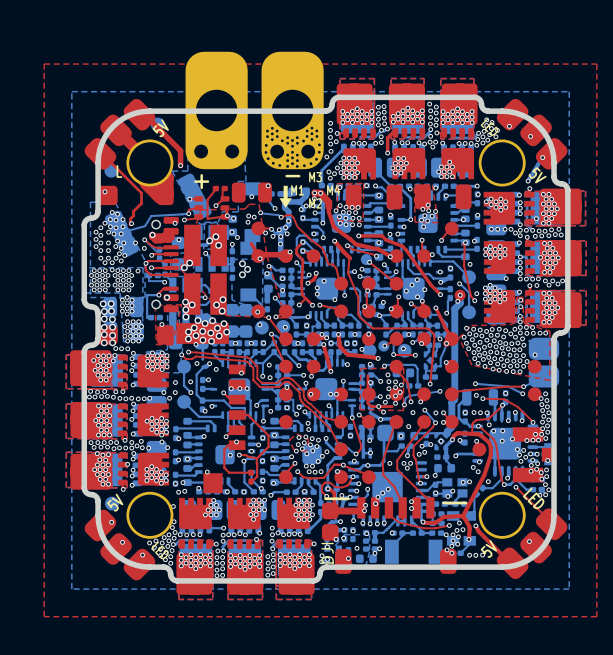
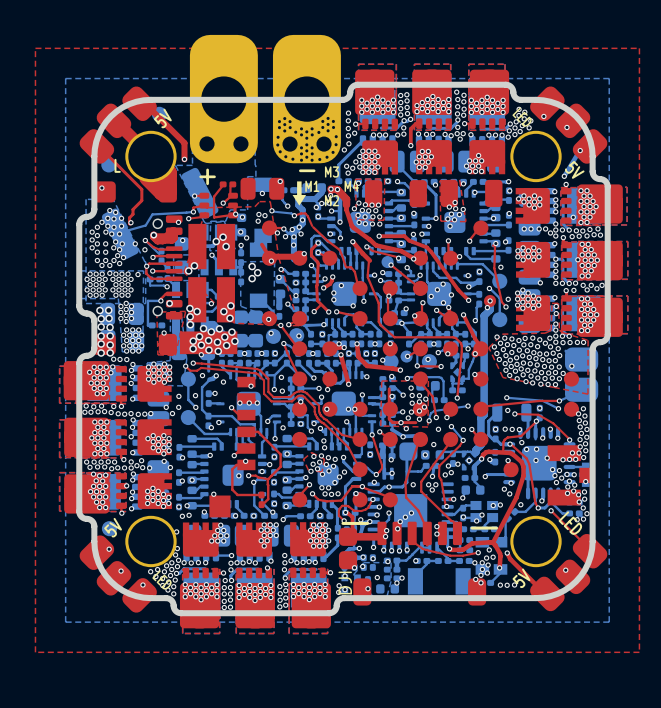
via: (364, 306) -> none
via: (443, 422) -> none

